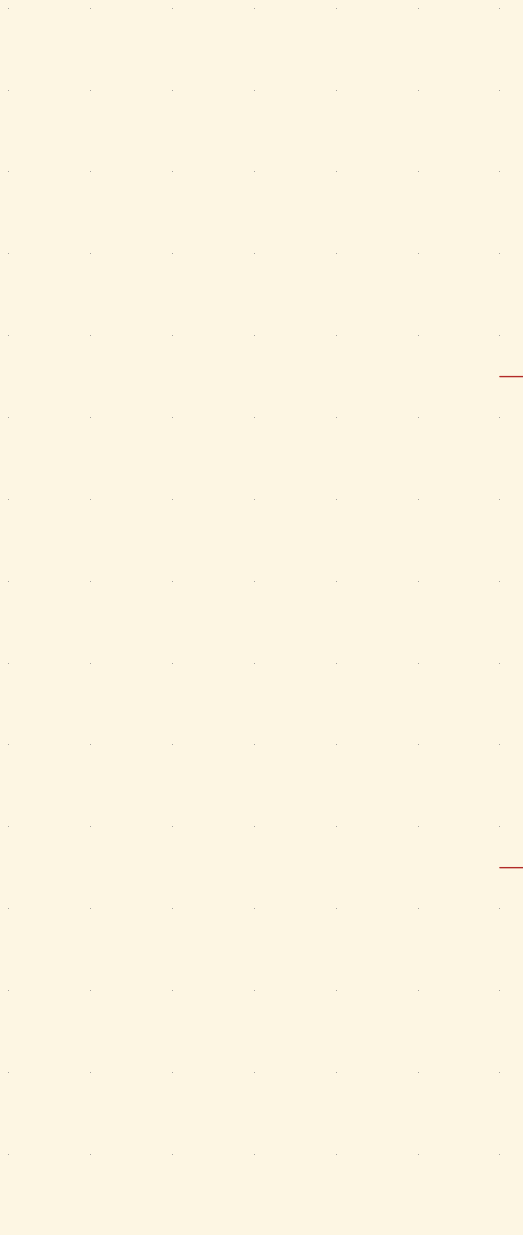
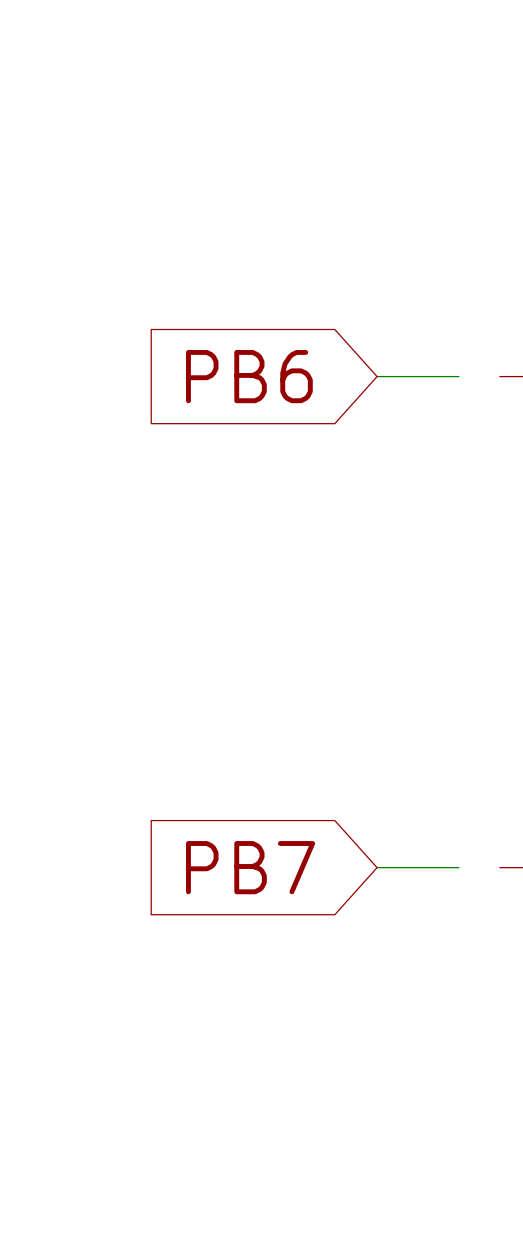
global label: none -> PB6 (249, 376)
wire: none -> (377, 376) (458, 376)
global label: none -> PB7 (250, 867)
wire: none -> (377, 867) (458, 867)

